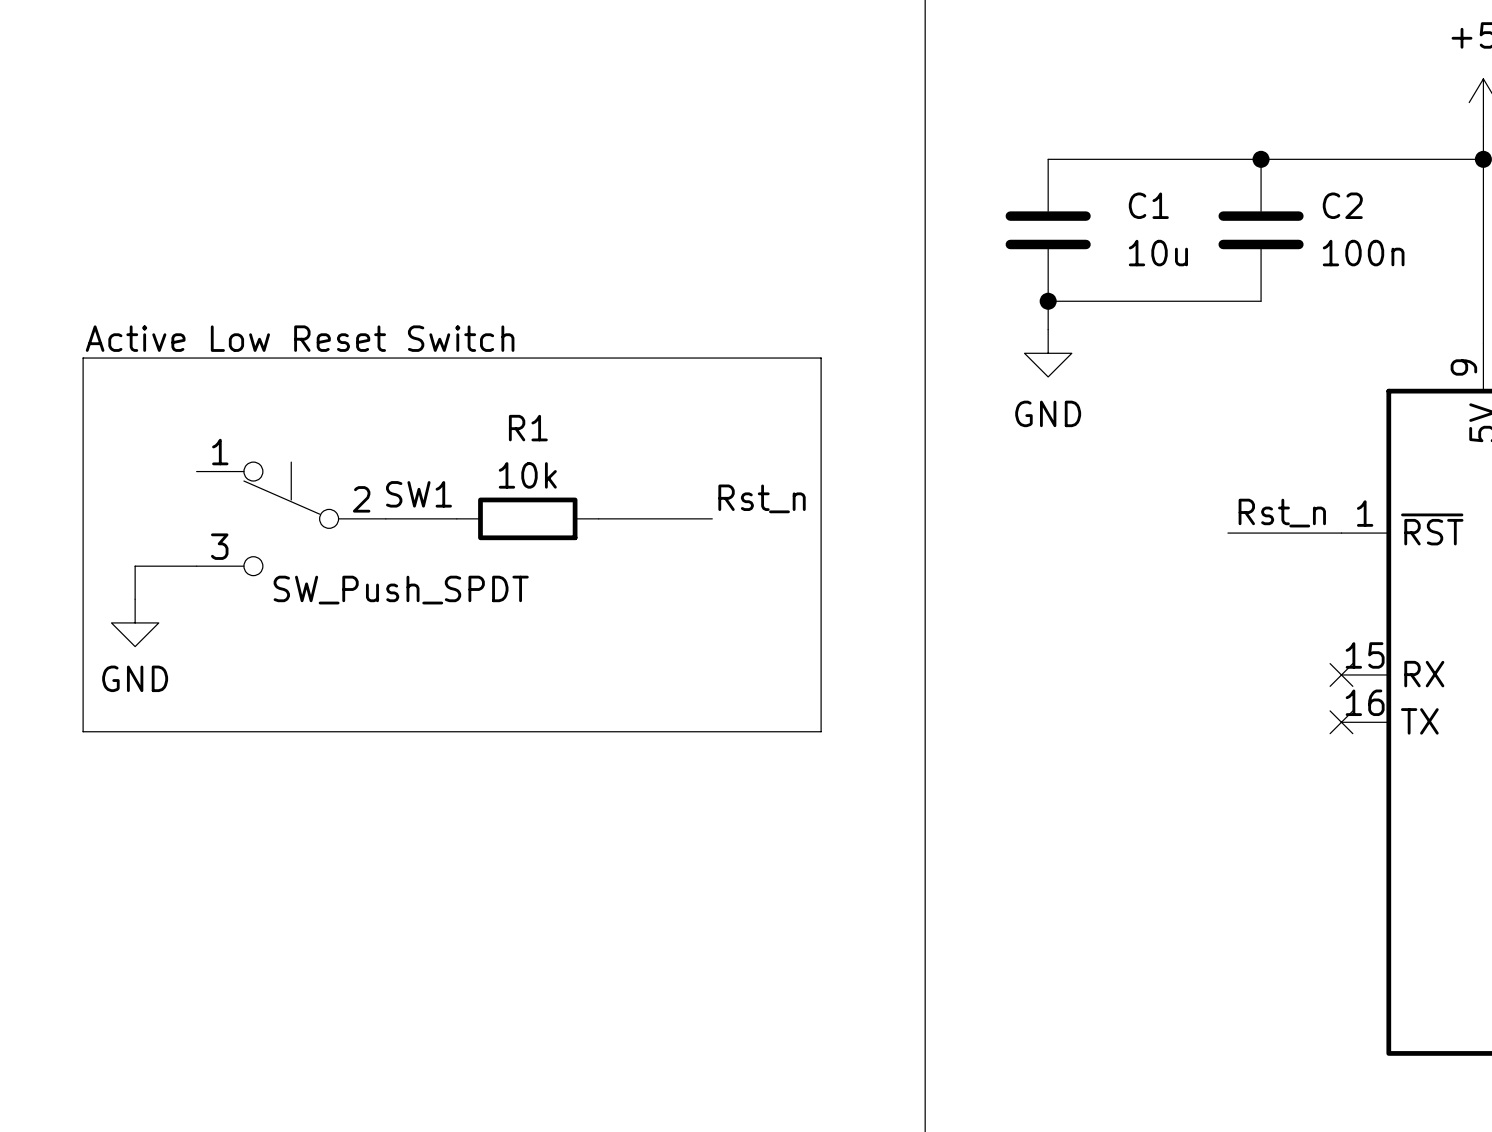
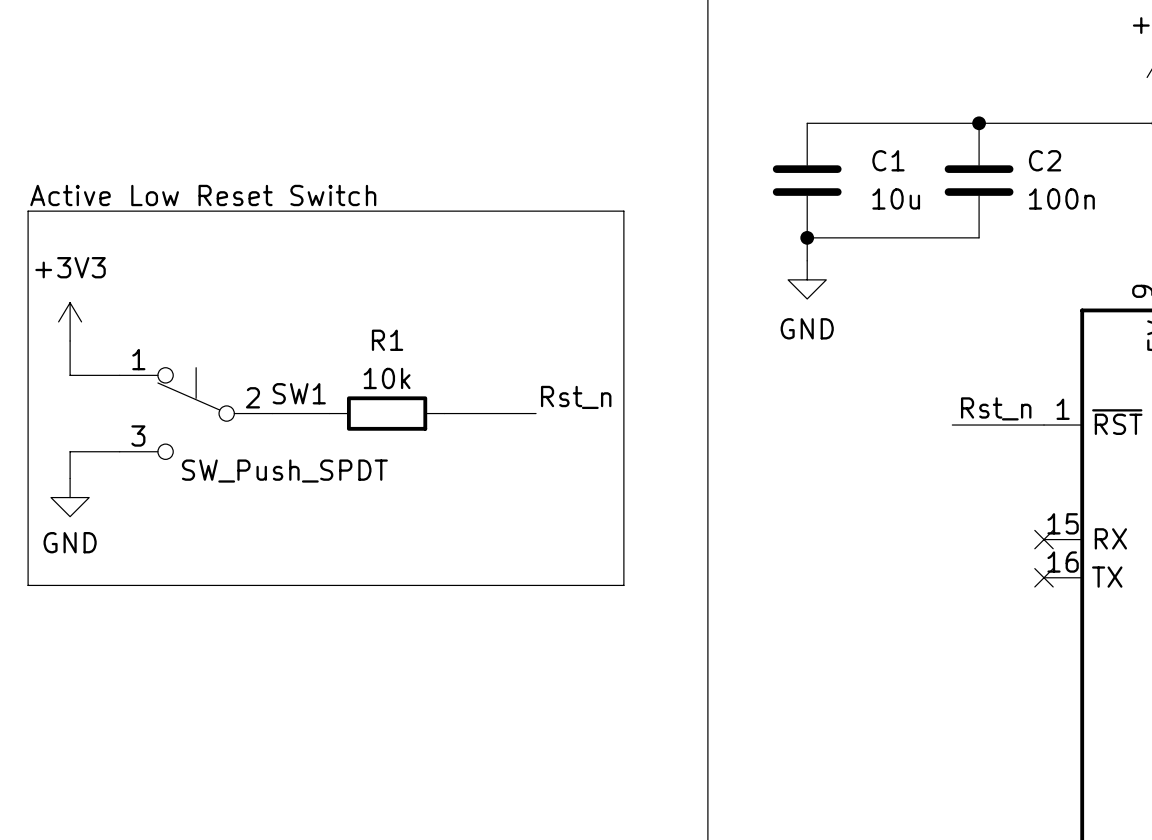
text position: Active Low Reset Switch (300, 338) -> Active Low Reset Switch (203, 195)
line: (83, 358) (821, 358) -> (28, 283) (28, 211) (623, 211) (623, 283)
power symbol: none -> +3V3 (70, 321)
wire: none -> (70, 340) (70, 375) (119, 375)

